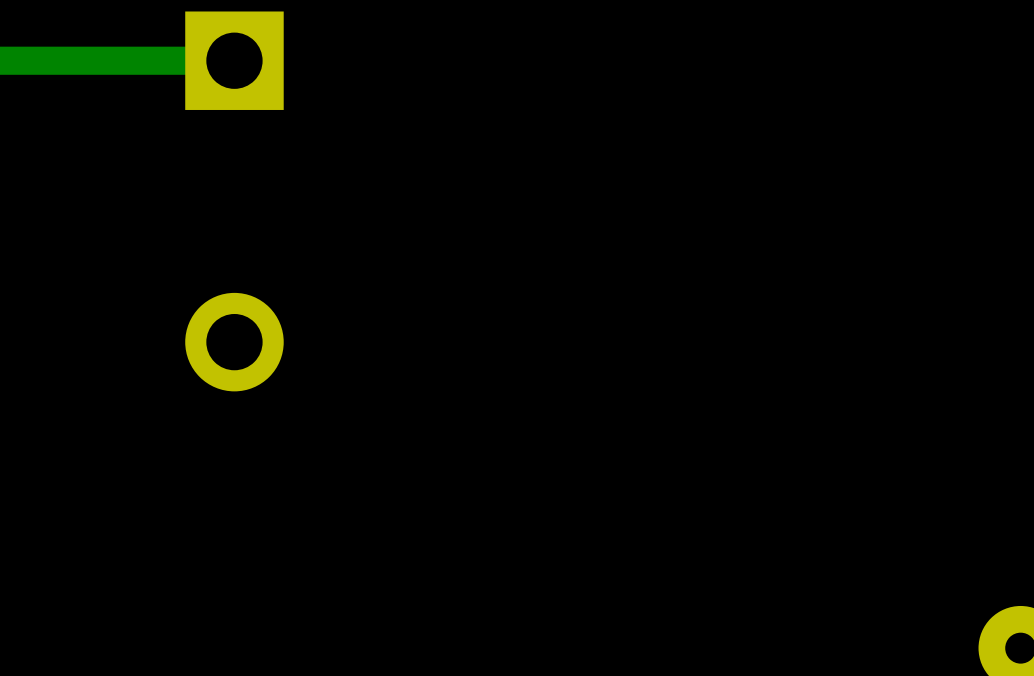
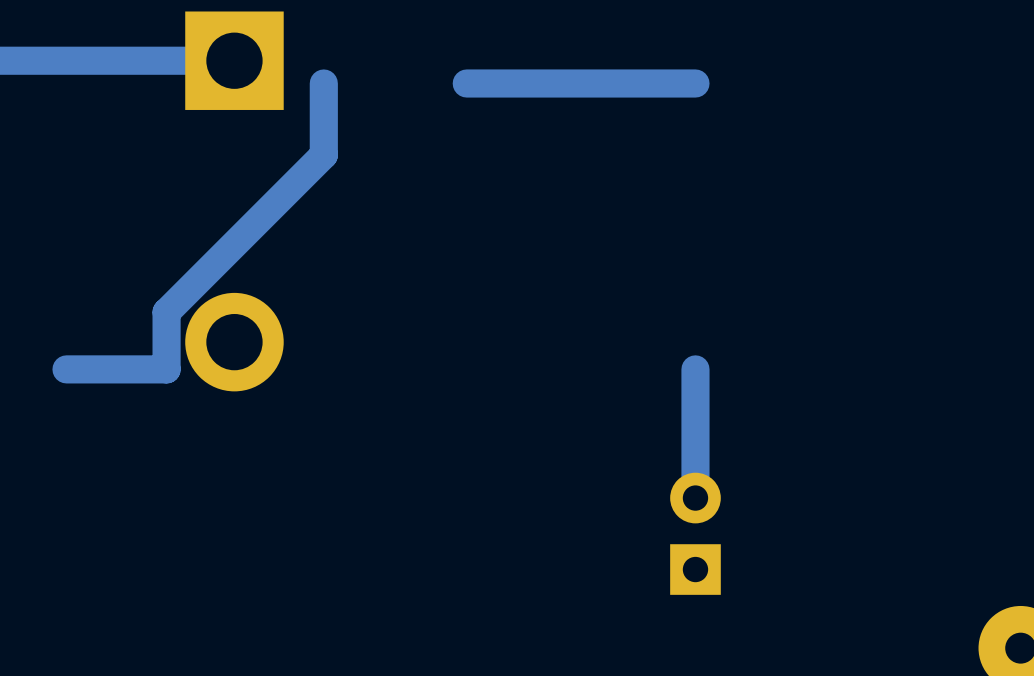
bottom track: none -> (323, 83) (323, 154) (166, 312) (166, 369) (66, 369)
bottom track: none -> (695, 83) (466, 83)
bottom track: none -> (695, 369) (695, 498)
part: none -> (695, 533)

